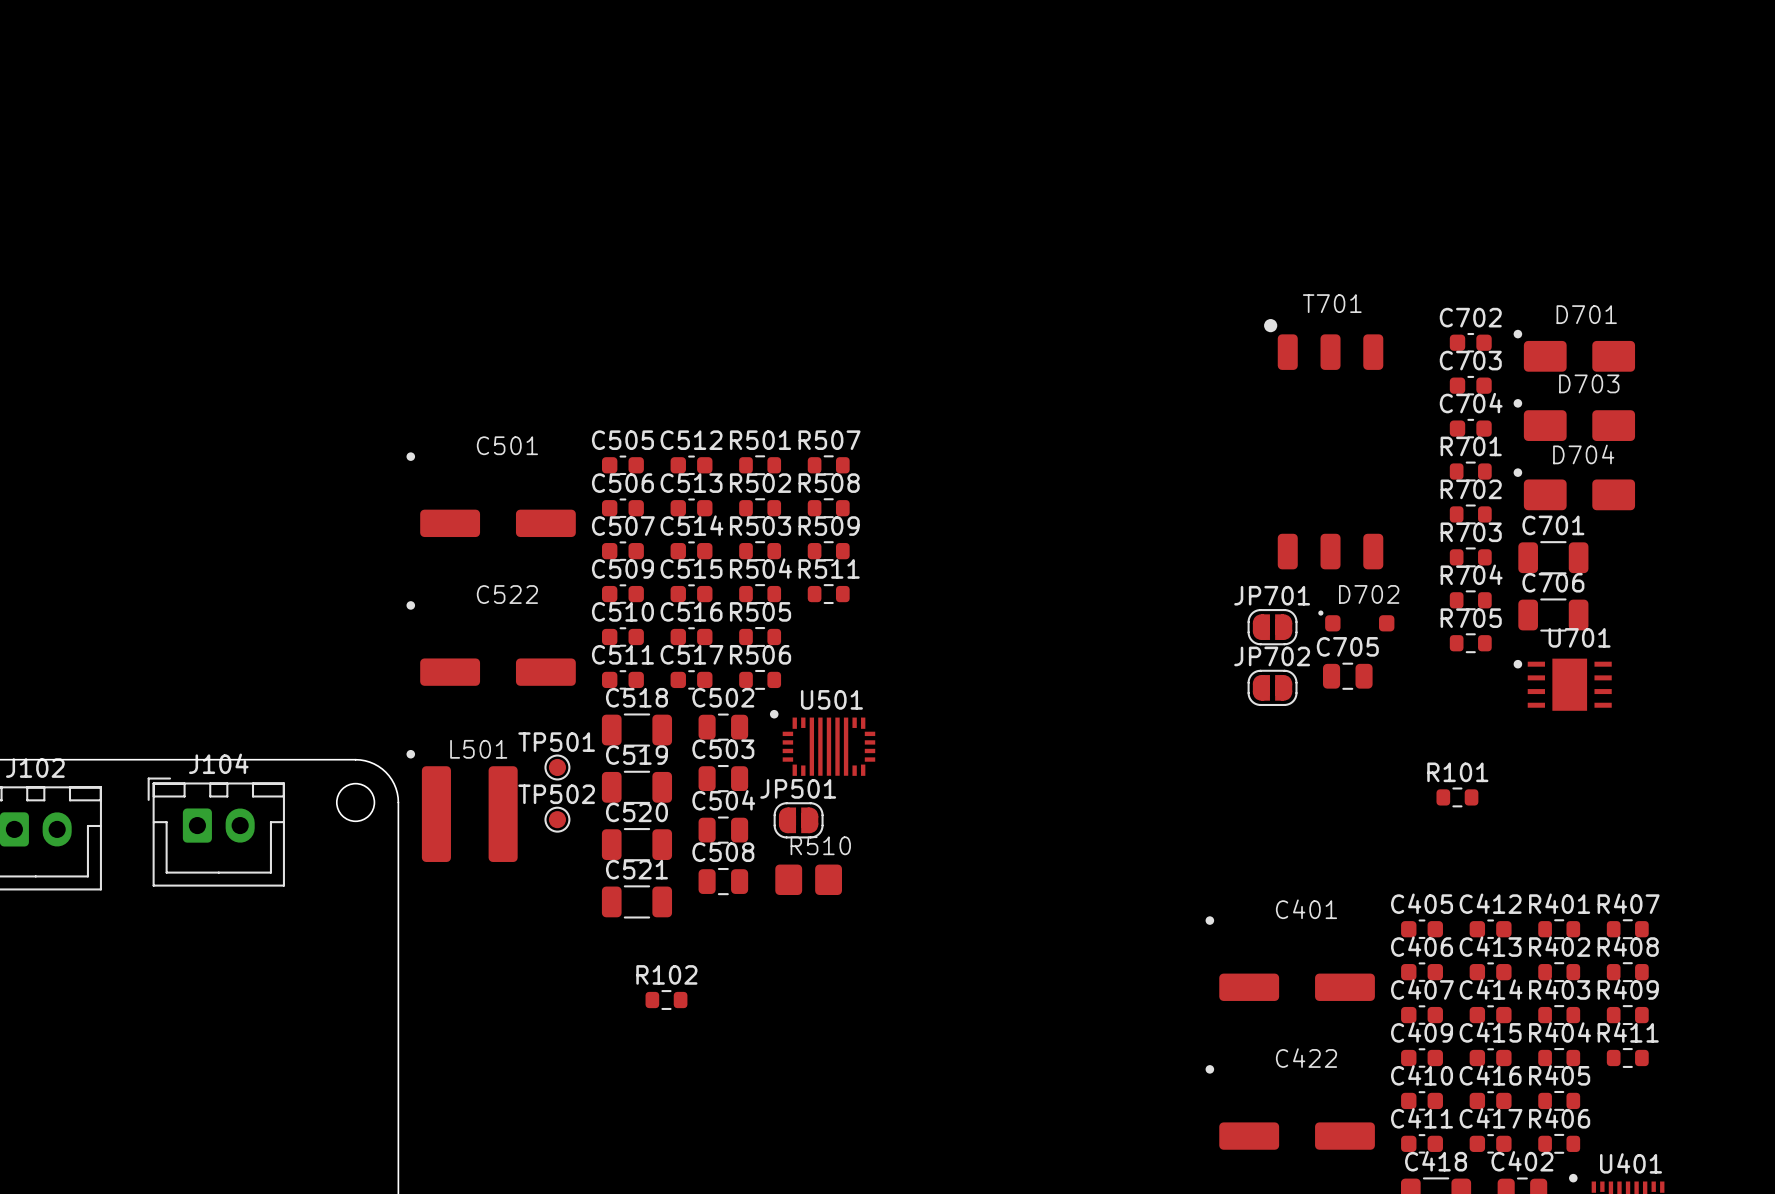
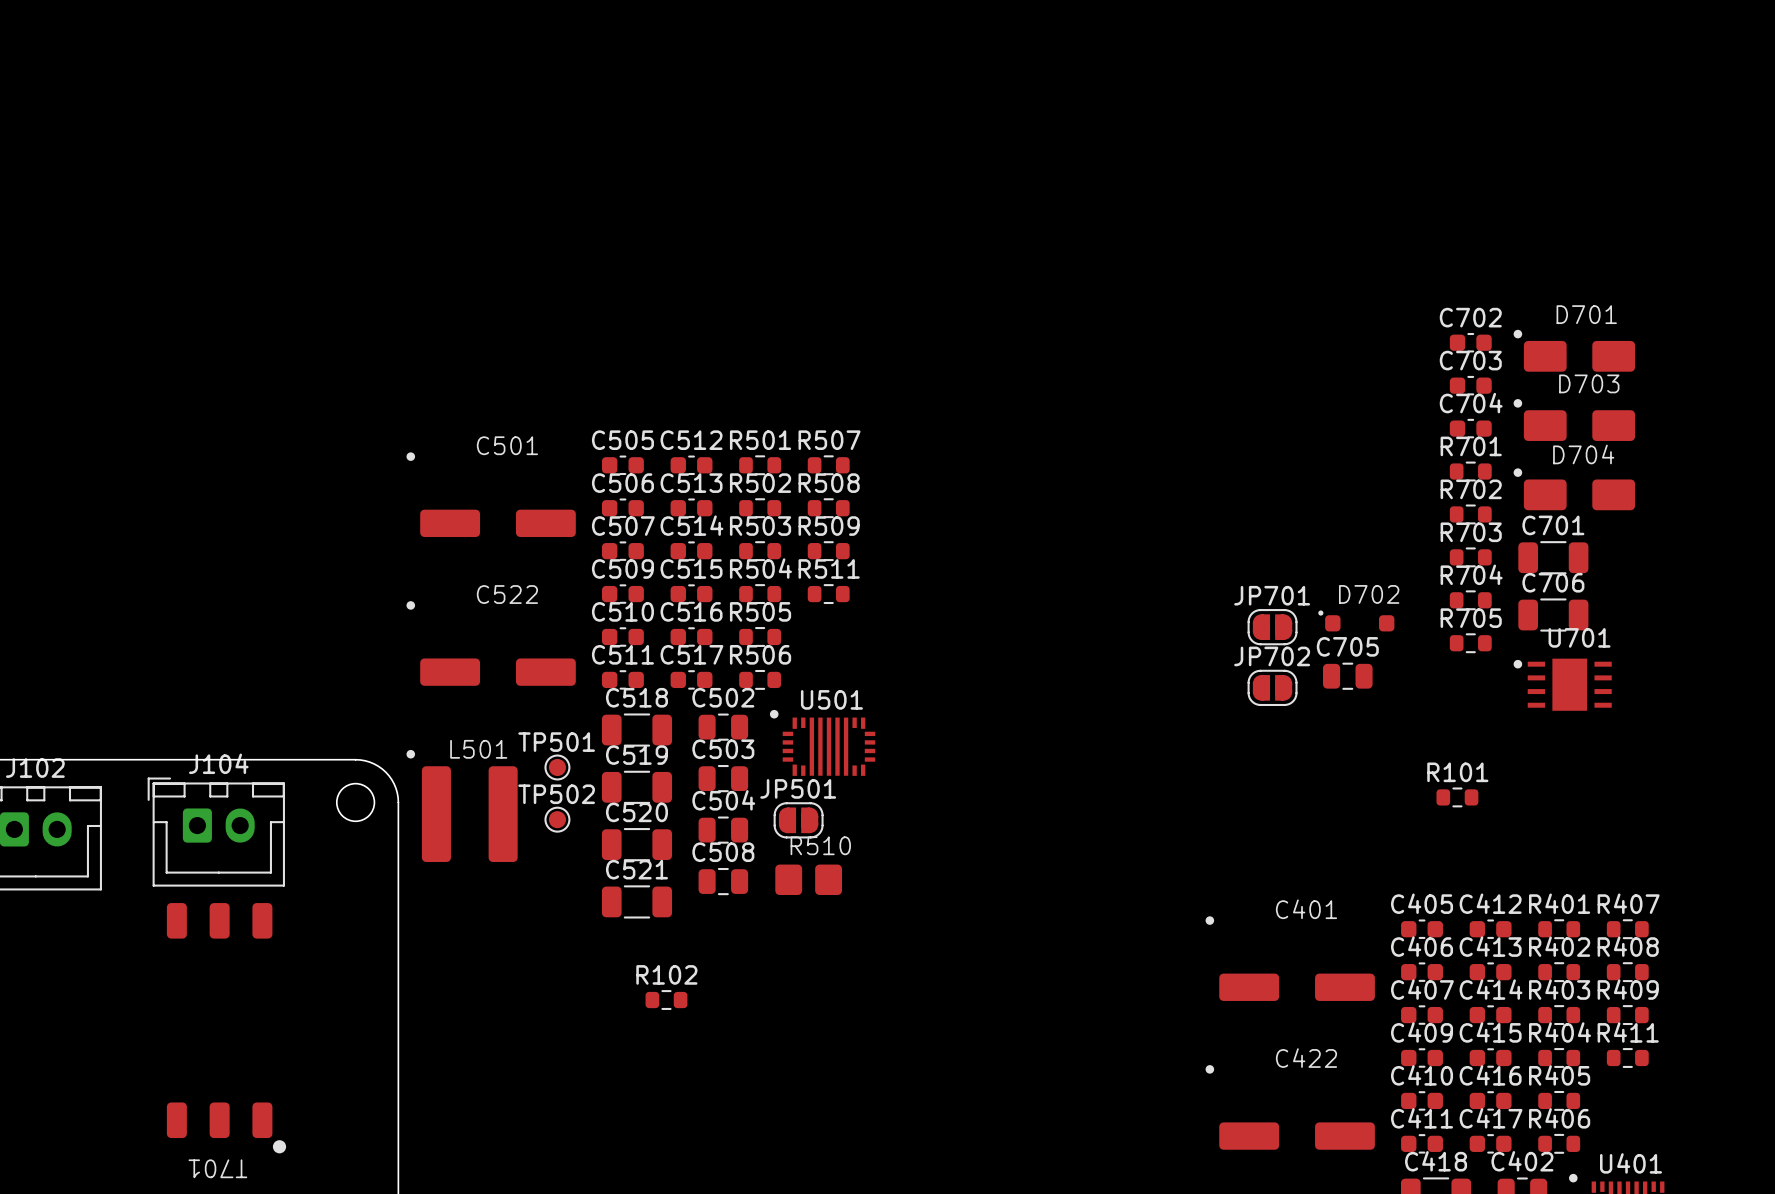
T701 rotation: 0° (1323, 444) -> 180° (226, 1028)
T701 position: (1323, 444) -> (226, 1028)

